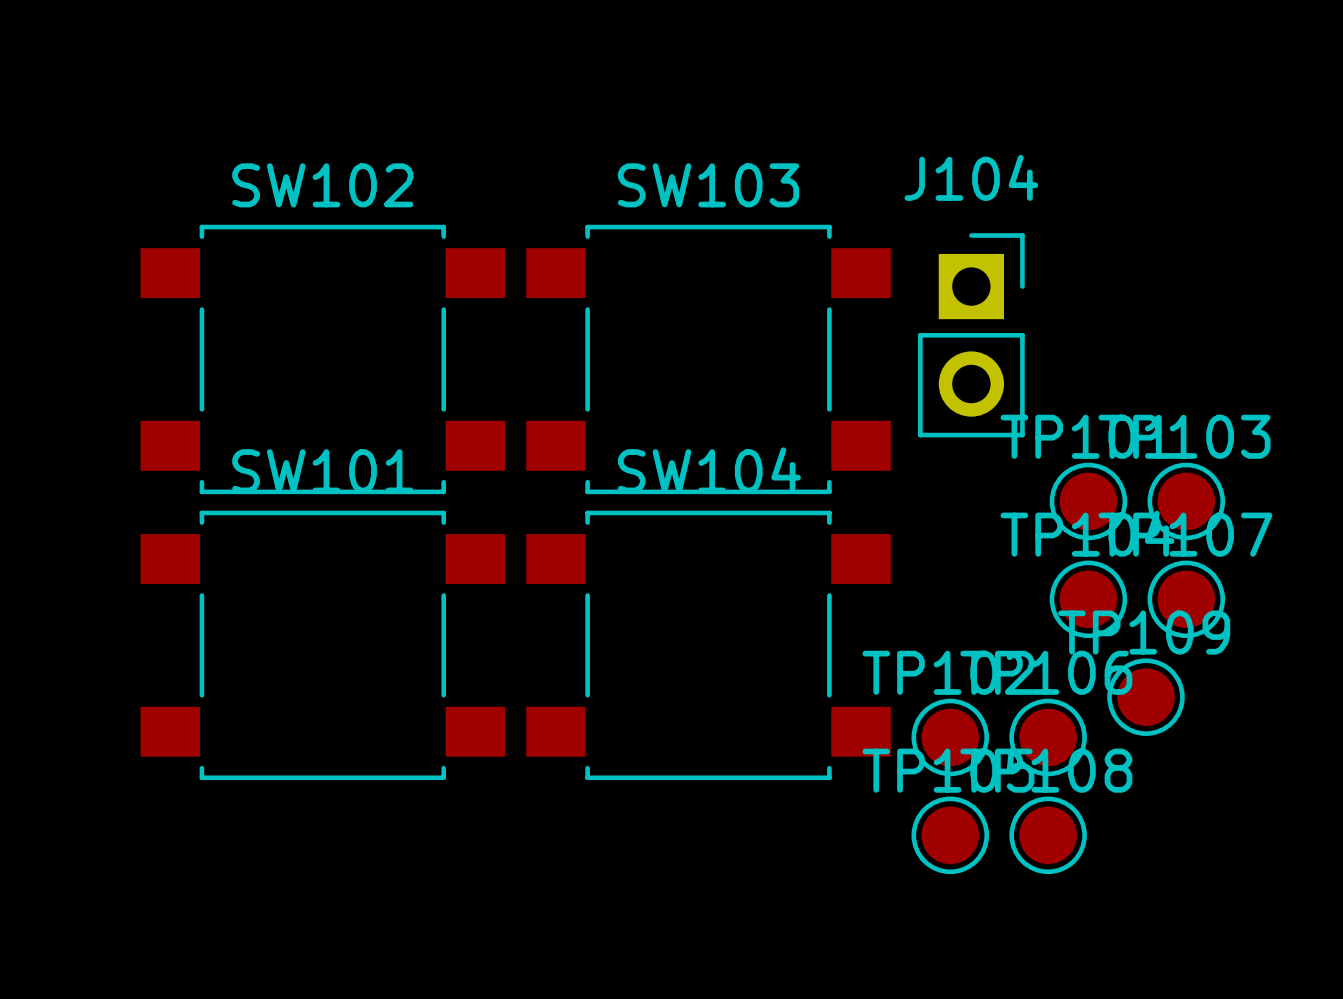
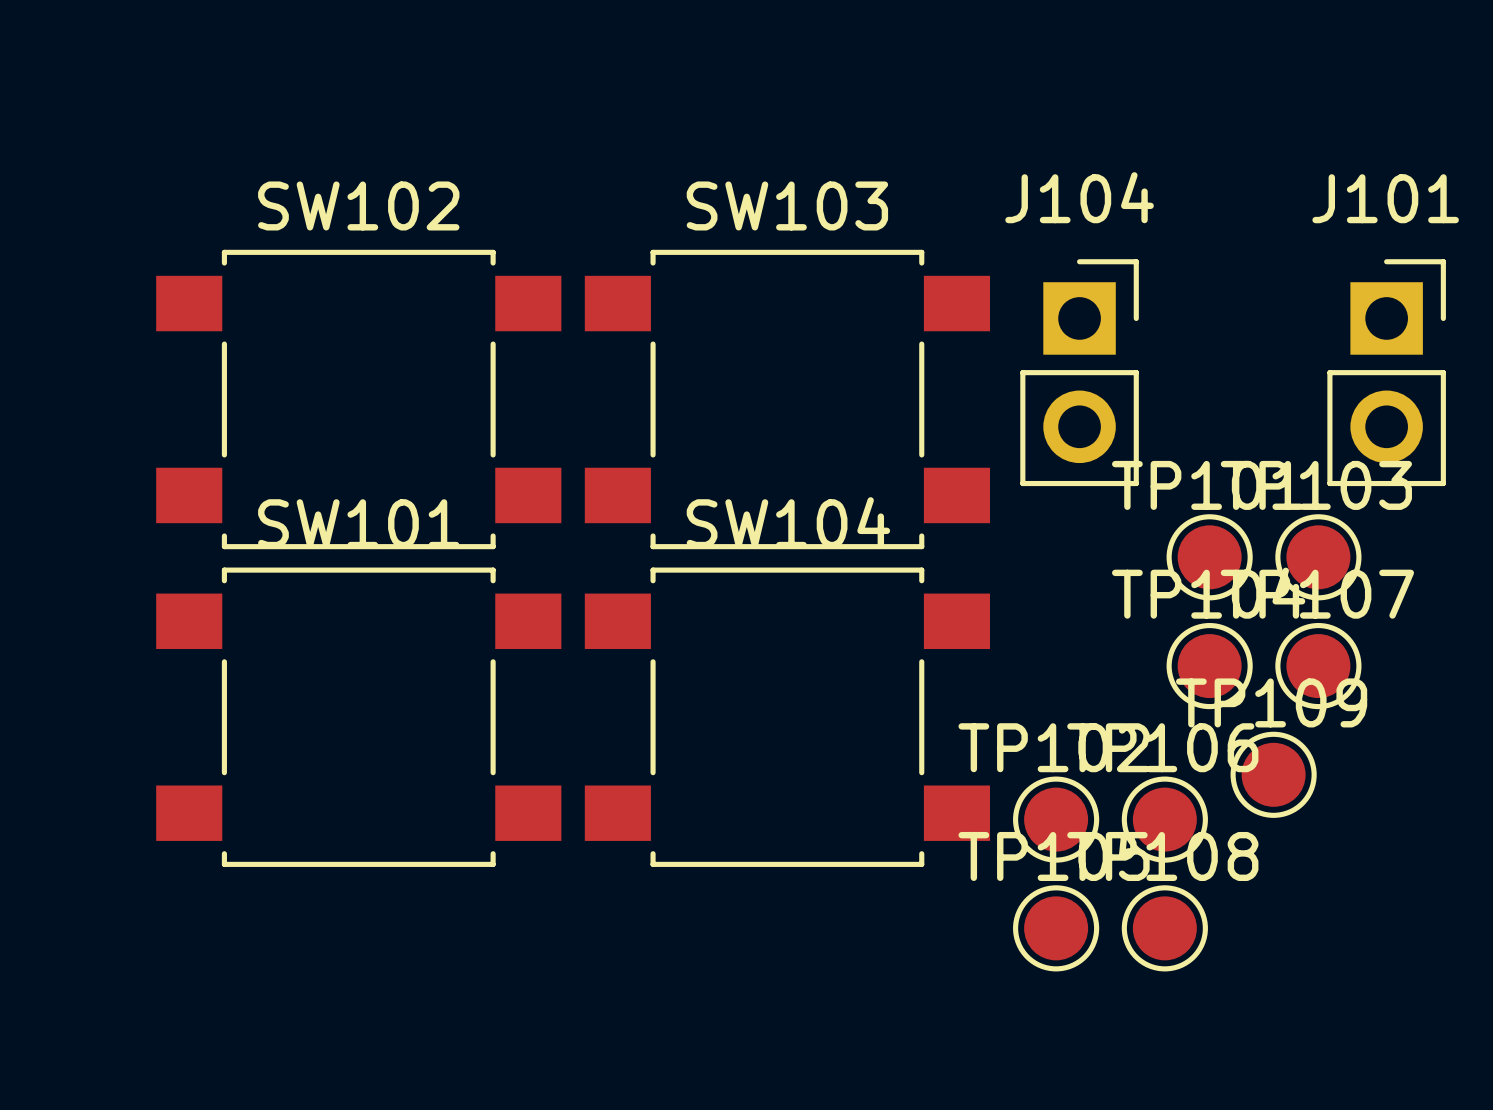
J101: none -> (1386, 372)

